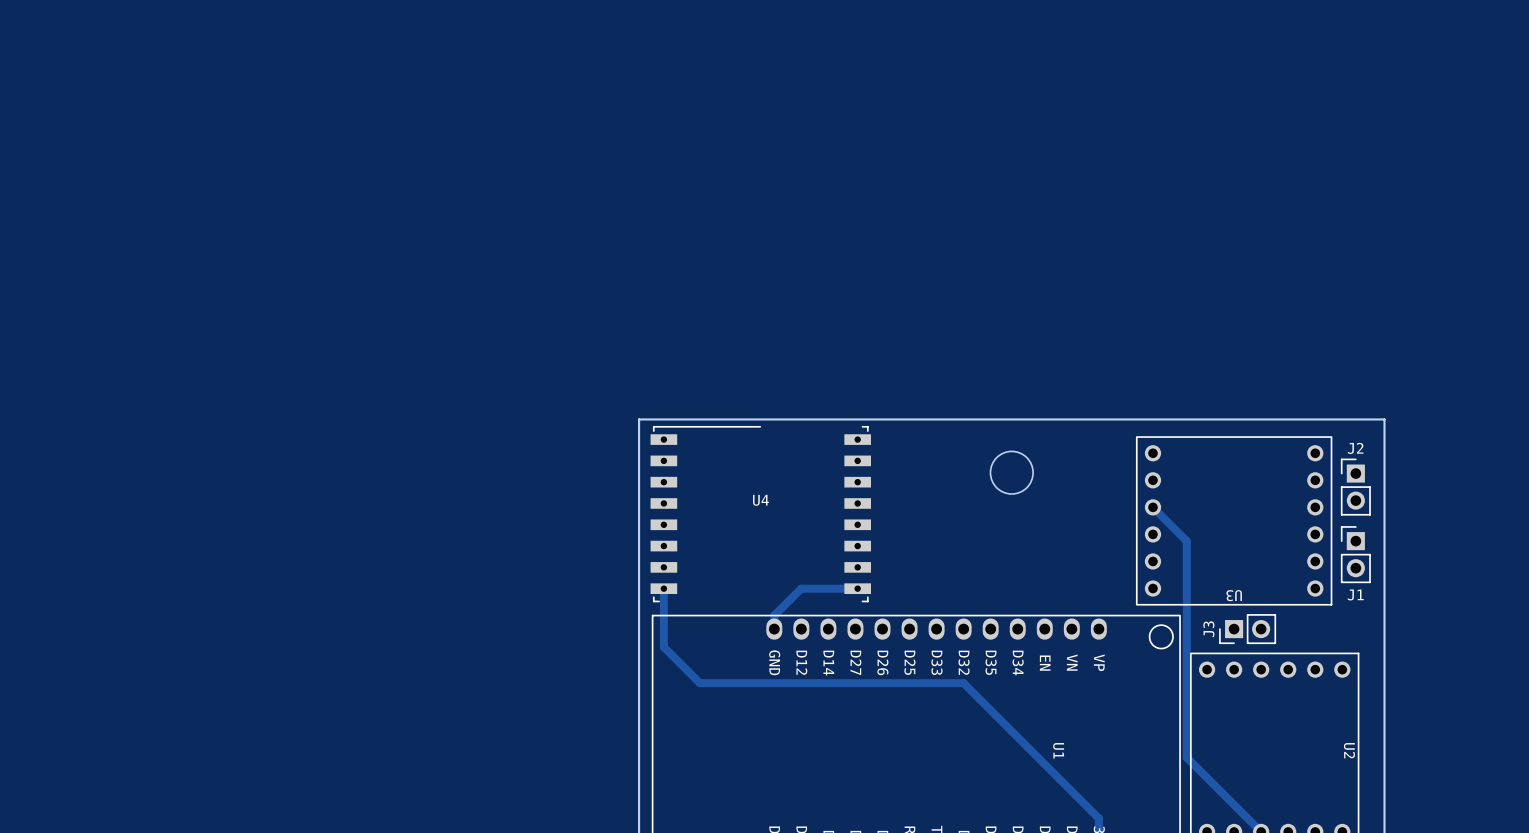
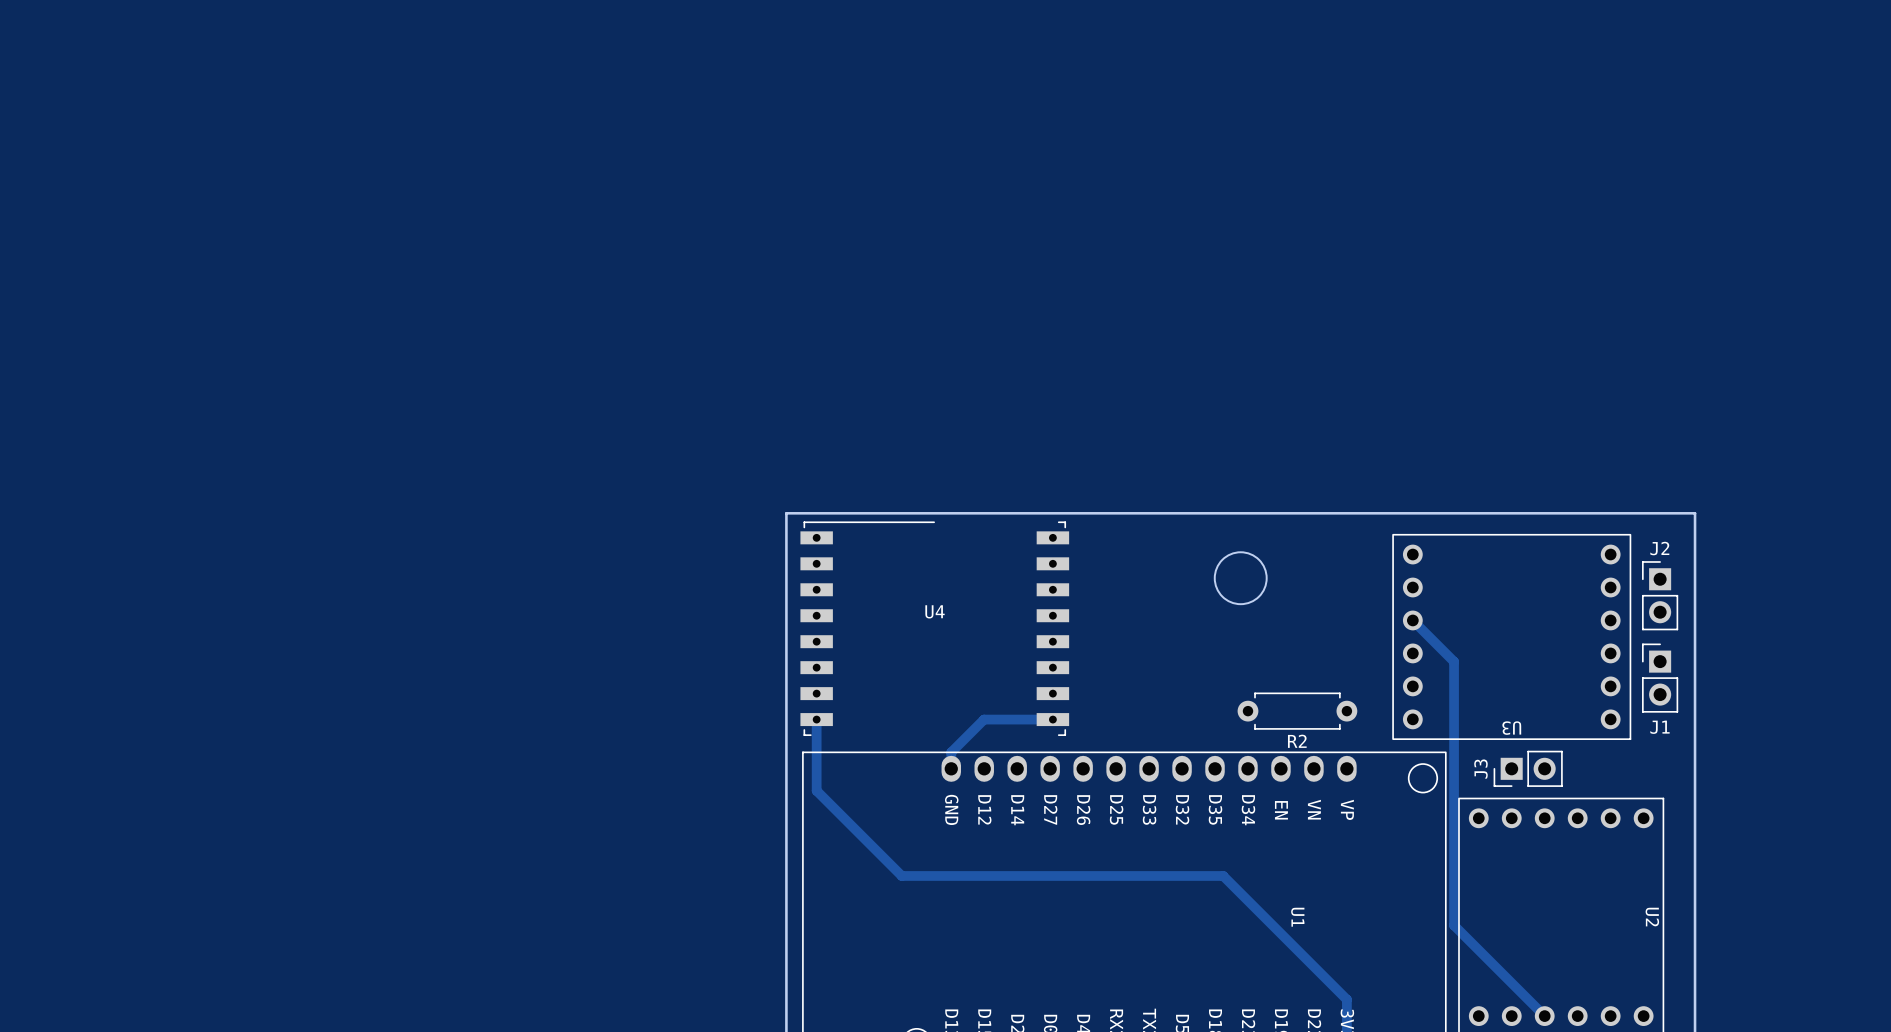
R2: none -> (1297, 711)
track: (699, 683) (963, 683) (997, 716) -> (860, 834) (901, 875) (1223, 875)

